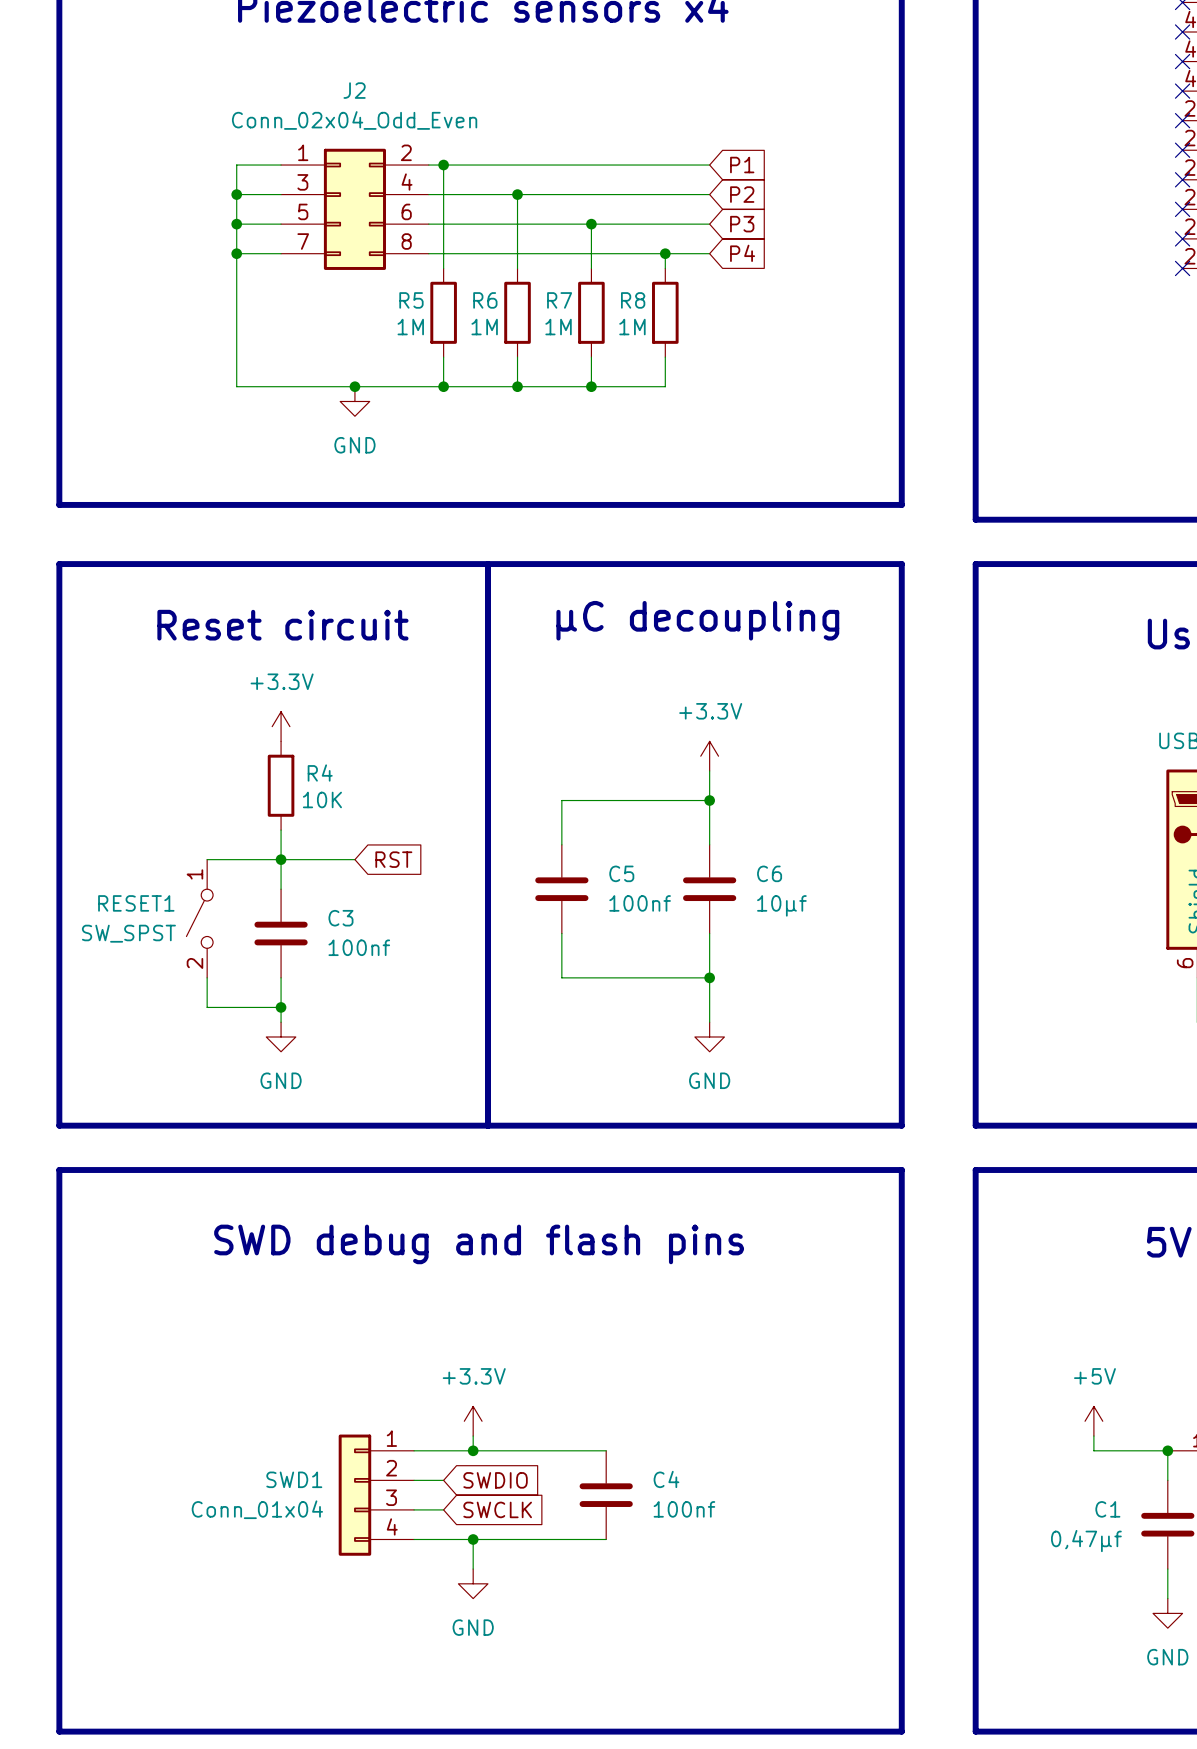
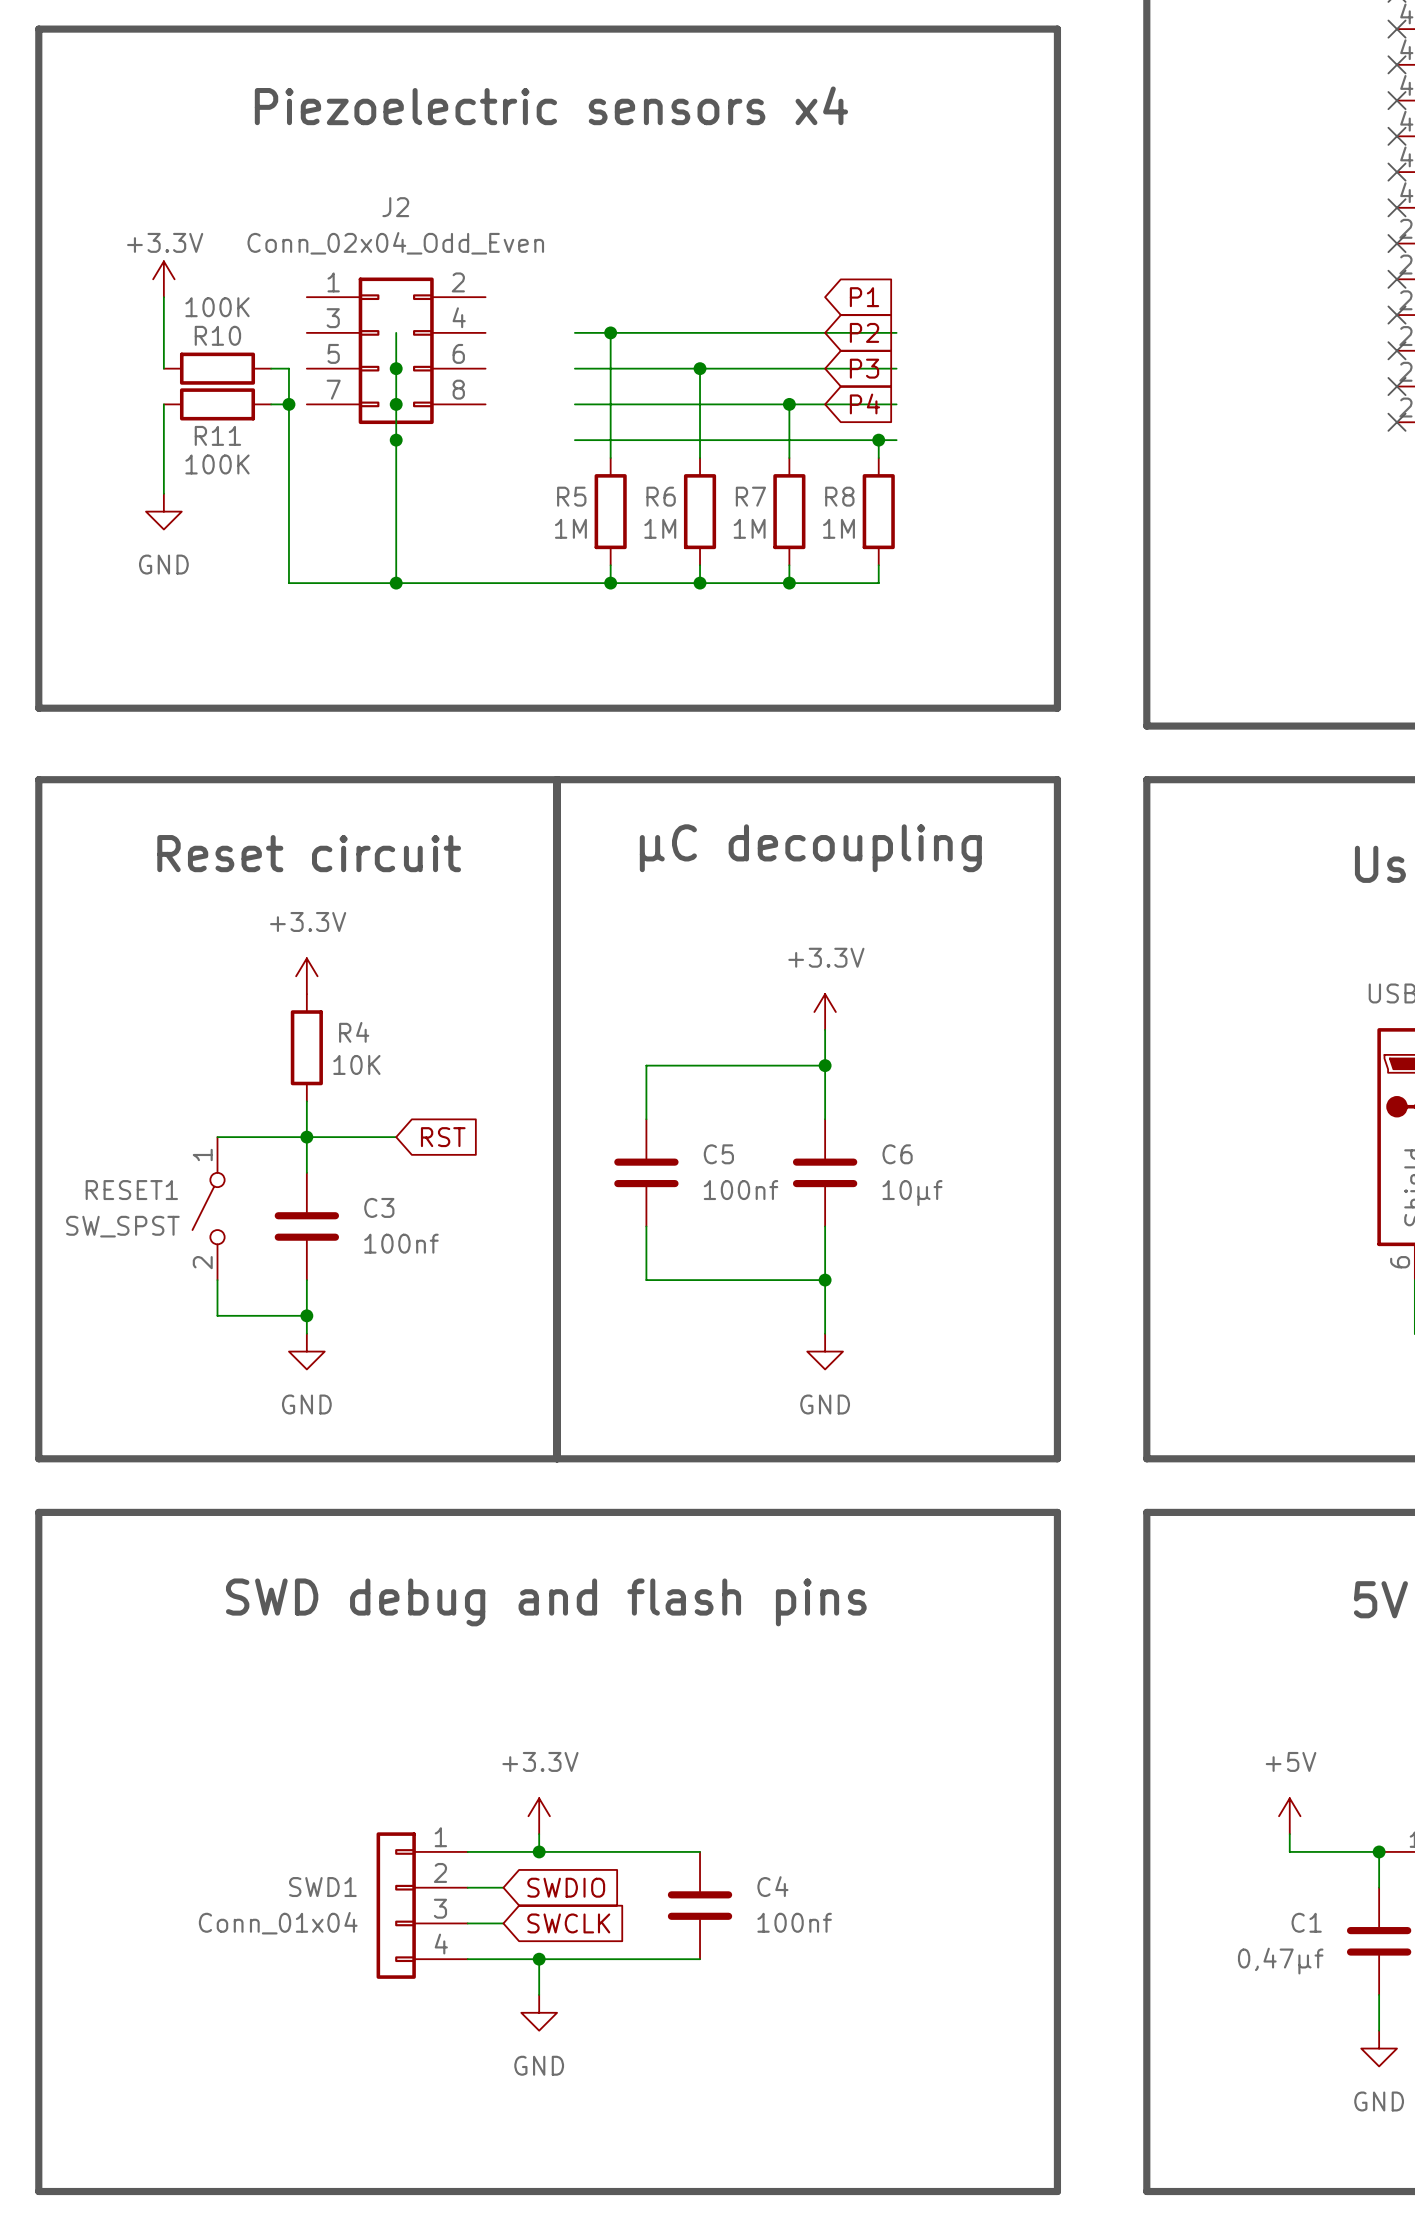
power symbol: none -> +3.3V (163, 279)
wire: none -> (163, 297) (163, 368)
wire: (281, 165) (236, 165) (236, 386) (665, 386) (665, 357) -> none
wire: (428, 165) (709, 165) -> none
wire: (443, 165) (443, 268) -> (610, 332) (610, 458)
junction: (443, 165) -> none
wire: (236, 194) (281, 194) -> none
junction: (236, 194) -> none
wire: none -> (396, 332) (396, 583)
wire: (428, 194) (502, 194) -> none
wire: (517, 194) (517, 268) -> (700, 368) (700, 458)
junction position: (517, 194) -> (610, 332)
wire: none -> (825, 332) (896, 332)
R10: none -> 100K (217, 368)
junction: (236, 224) -> none
wire: (266, 224) (281, 224) -> (288, 368) (288, 583) (878, 583) (878, 565)
junction: none -> (396, 368)
wire: (428, 224) (502, 224) -> none
wire: (591, 224) (591, 268) -> (789, 404) (789, 458)
junction position: (591, 224) -> (700, 368)
wire: none -> (825, 368) (896, 368)
wire: none -> (163, 404) (163, 493)
R11: none -> 100K (217, 404)
junction: (236, 253) -> none
wire: (266, 253) (281, 253) -> none
junction: none -> (288, 404)
junction: none -> (396, 404)
wire: (428, 253) (502, 253) -> none
wire: (665, 253) (665, 268) -> (878, 440) (878, 458)
junction position: (665, 253) -> (789, 404)
wire: none -> (825, 404) (896, 404)
junction: none -> (396, 440)
wire: none -> (574, 440) (896, 440)
junction: none -> (878, 440)
R5 position: (443, 312) -> (610, 511)
R6 position: (517, 312) -> (700, 511)
R7 position: (591, 312) -> (789, 511)
R8 position: (665, 312) -> (878, 511)
wire: (443, 357) (443, 386) -> none
wire: (517, 357) (517, 386) -> none
wire: (591, 357) (591, 386) -> none
junction position: (354, 386) -> (396, 583)
junction: (443, 386) -> none
junction position: (517, 386) -> (610, 583)
wire: none -> (610, 565) (610, 583)
junction position: (591, 386) -> (700, 583)
wire: none -> (700, 565) (700, 583)
wire: none -> (789, 565) (789, 583)
power symbol position: GND (354, 401) -> GND (163, 511)
junction: none -> (789, 583)

